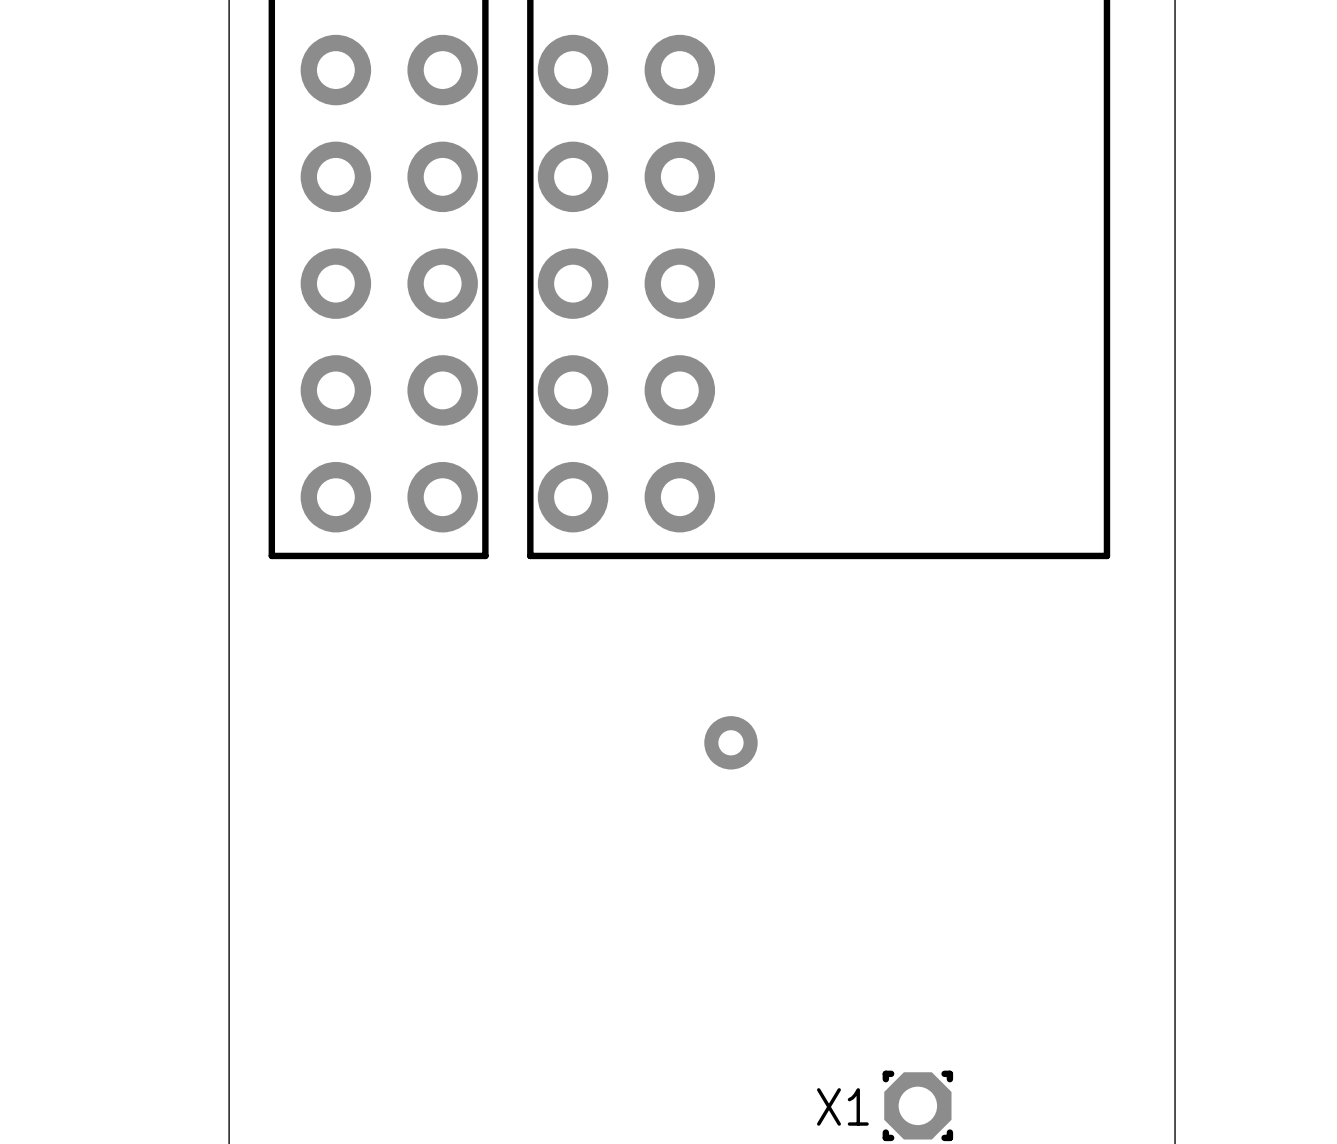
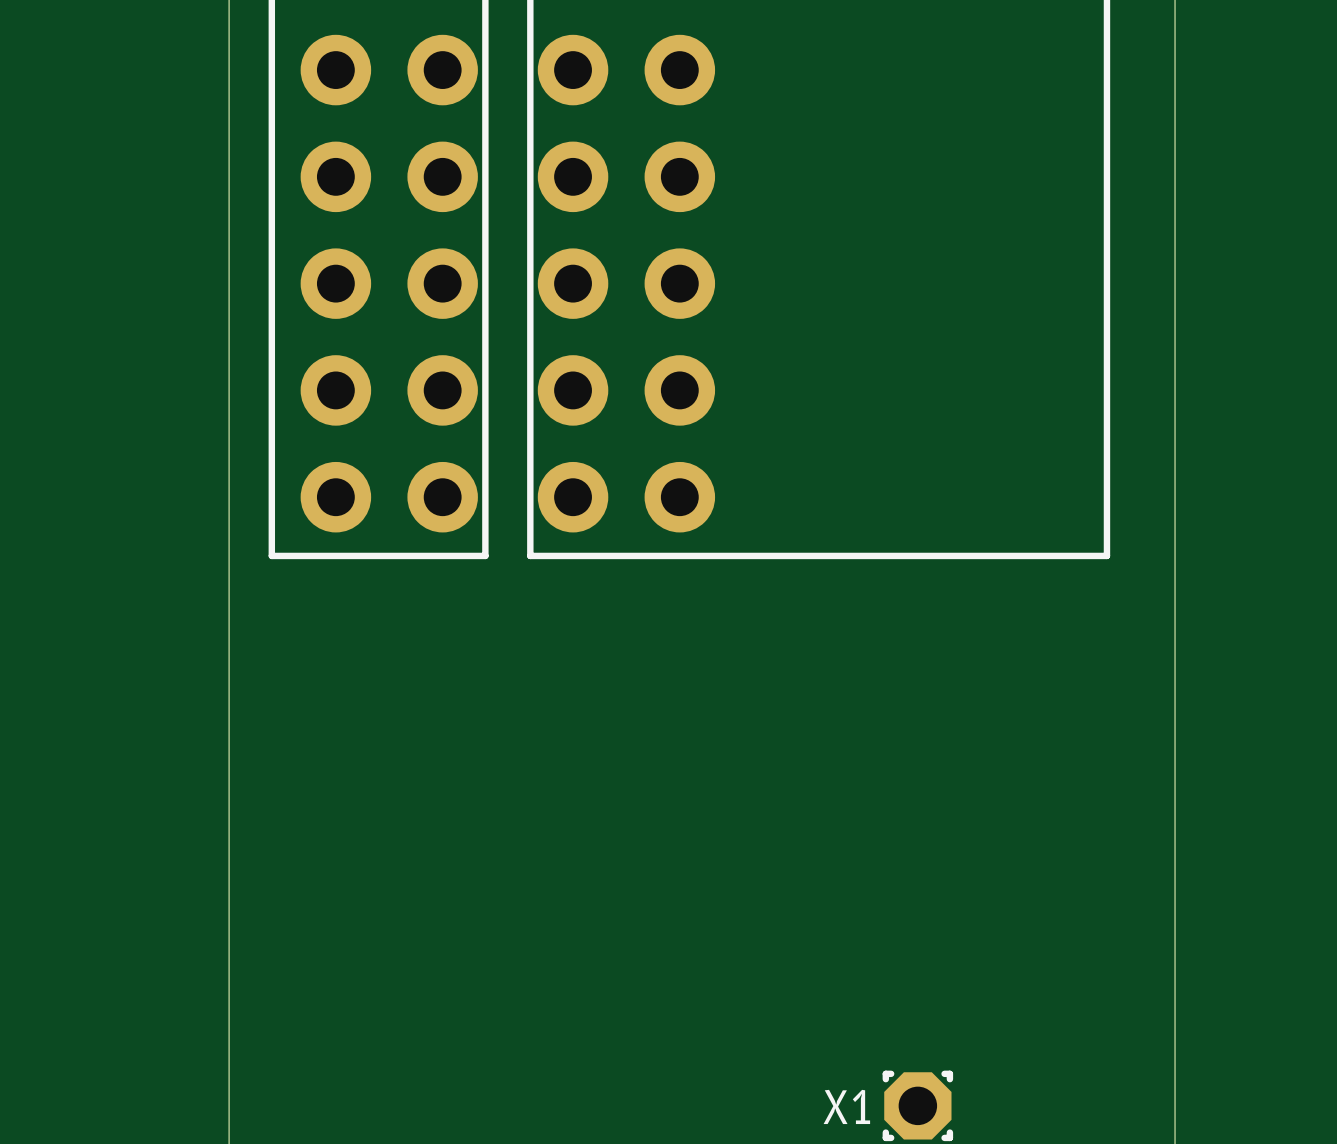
via: (730, 742) -> none

